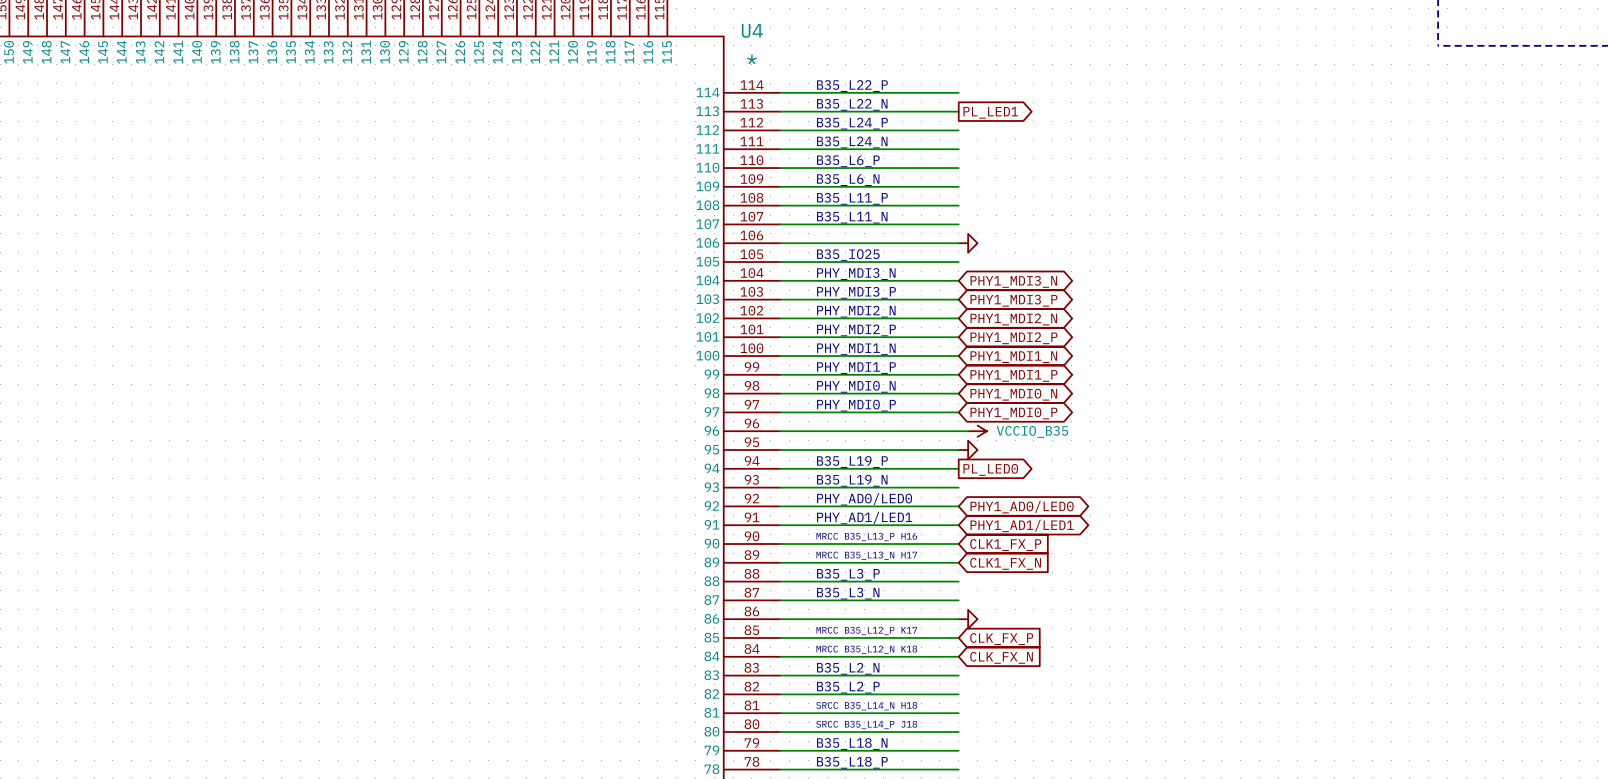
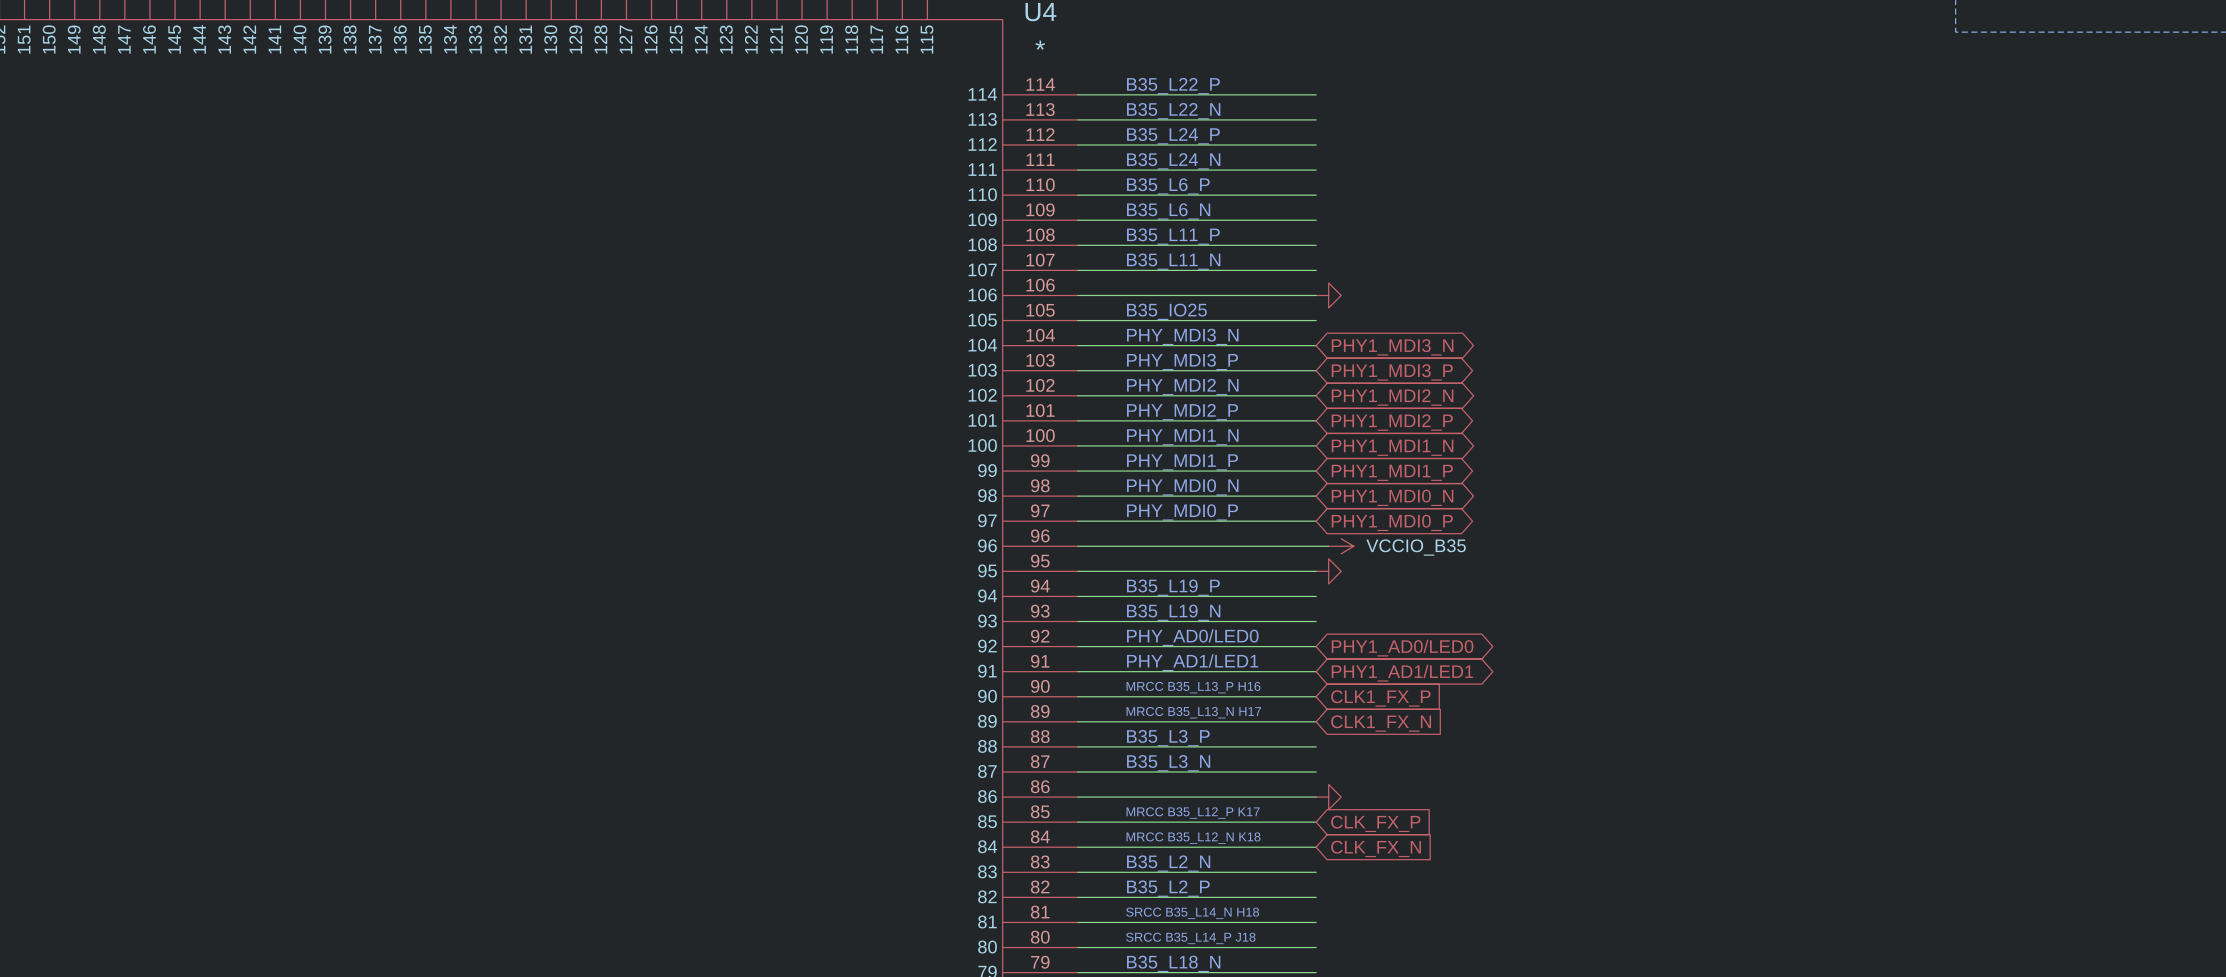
global label: PL_LED1 (990, 112) -> none
global label: PL_LED0 (990, 469) -> none

